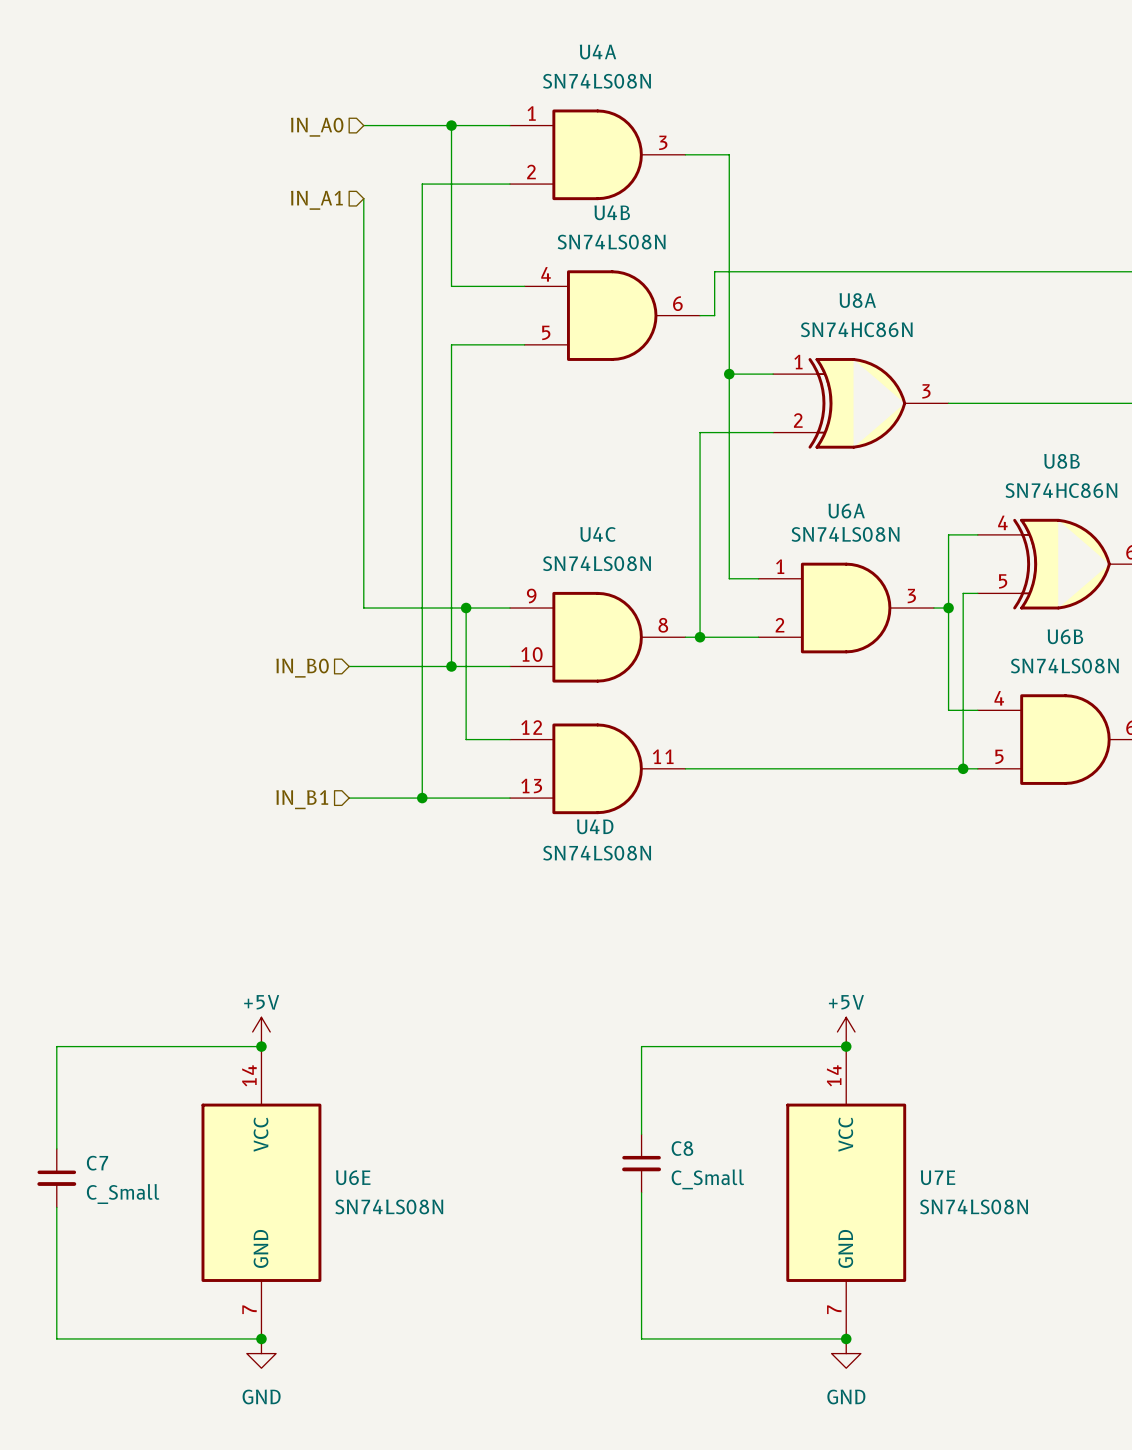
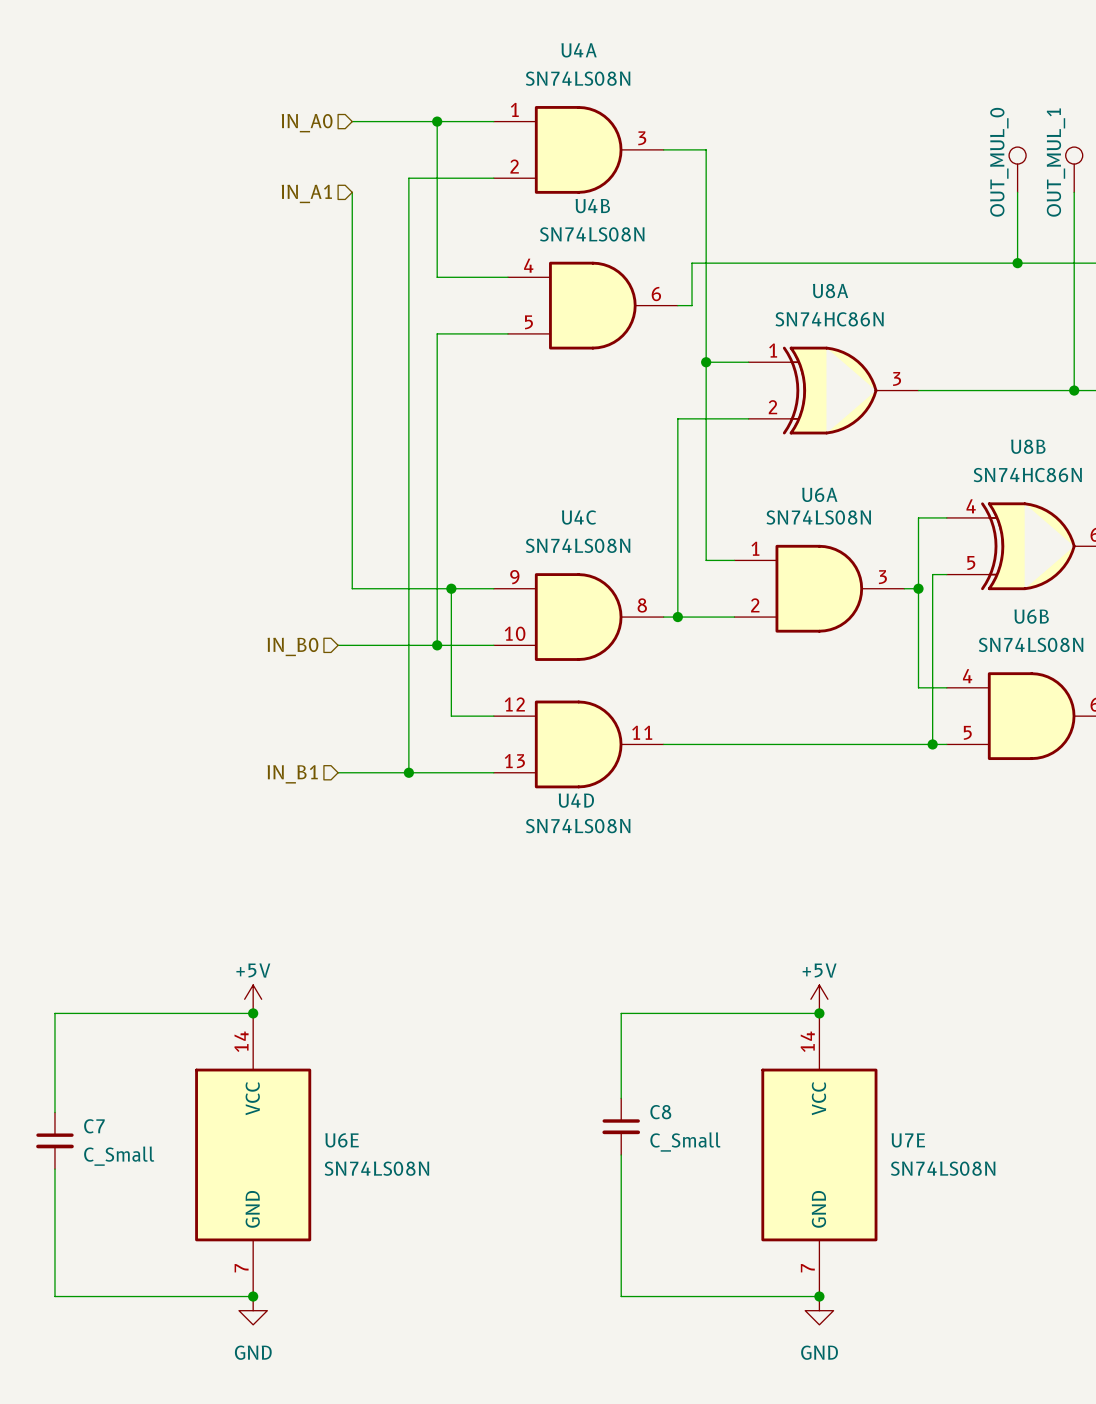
OUT_MUL_0: none -> (1017, 169)
OUT_MUL_1: none -> (1074, 169)
wire: none -> (1017, 192) (1017, 263)
wire: none -> (1074, 192) (1074, 390)
junction: none -> (1017, 263)
junction: none -> (1074, 390)

